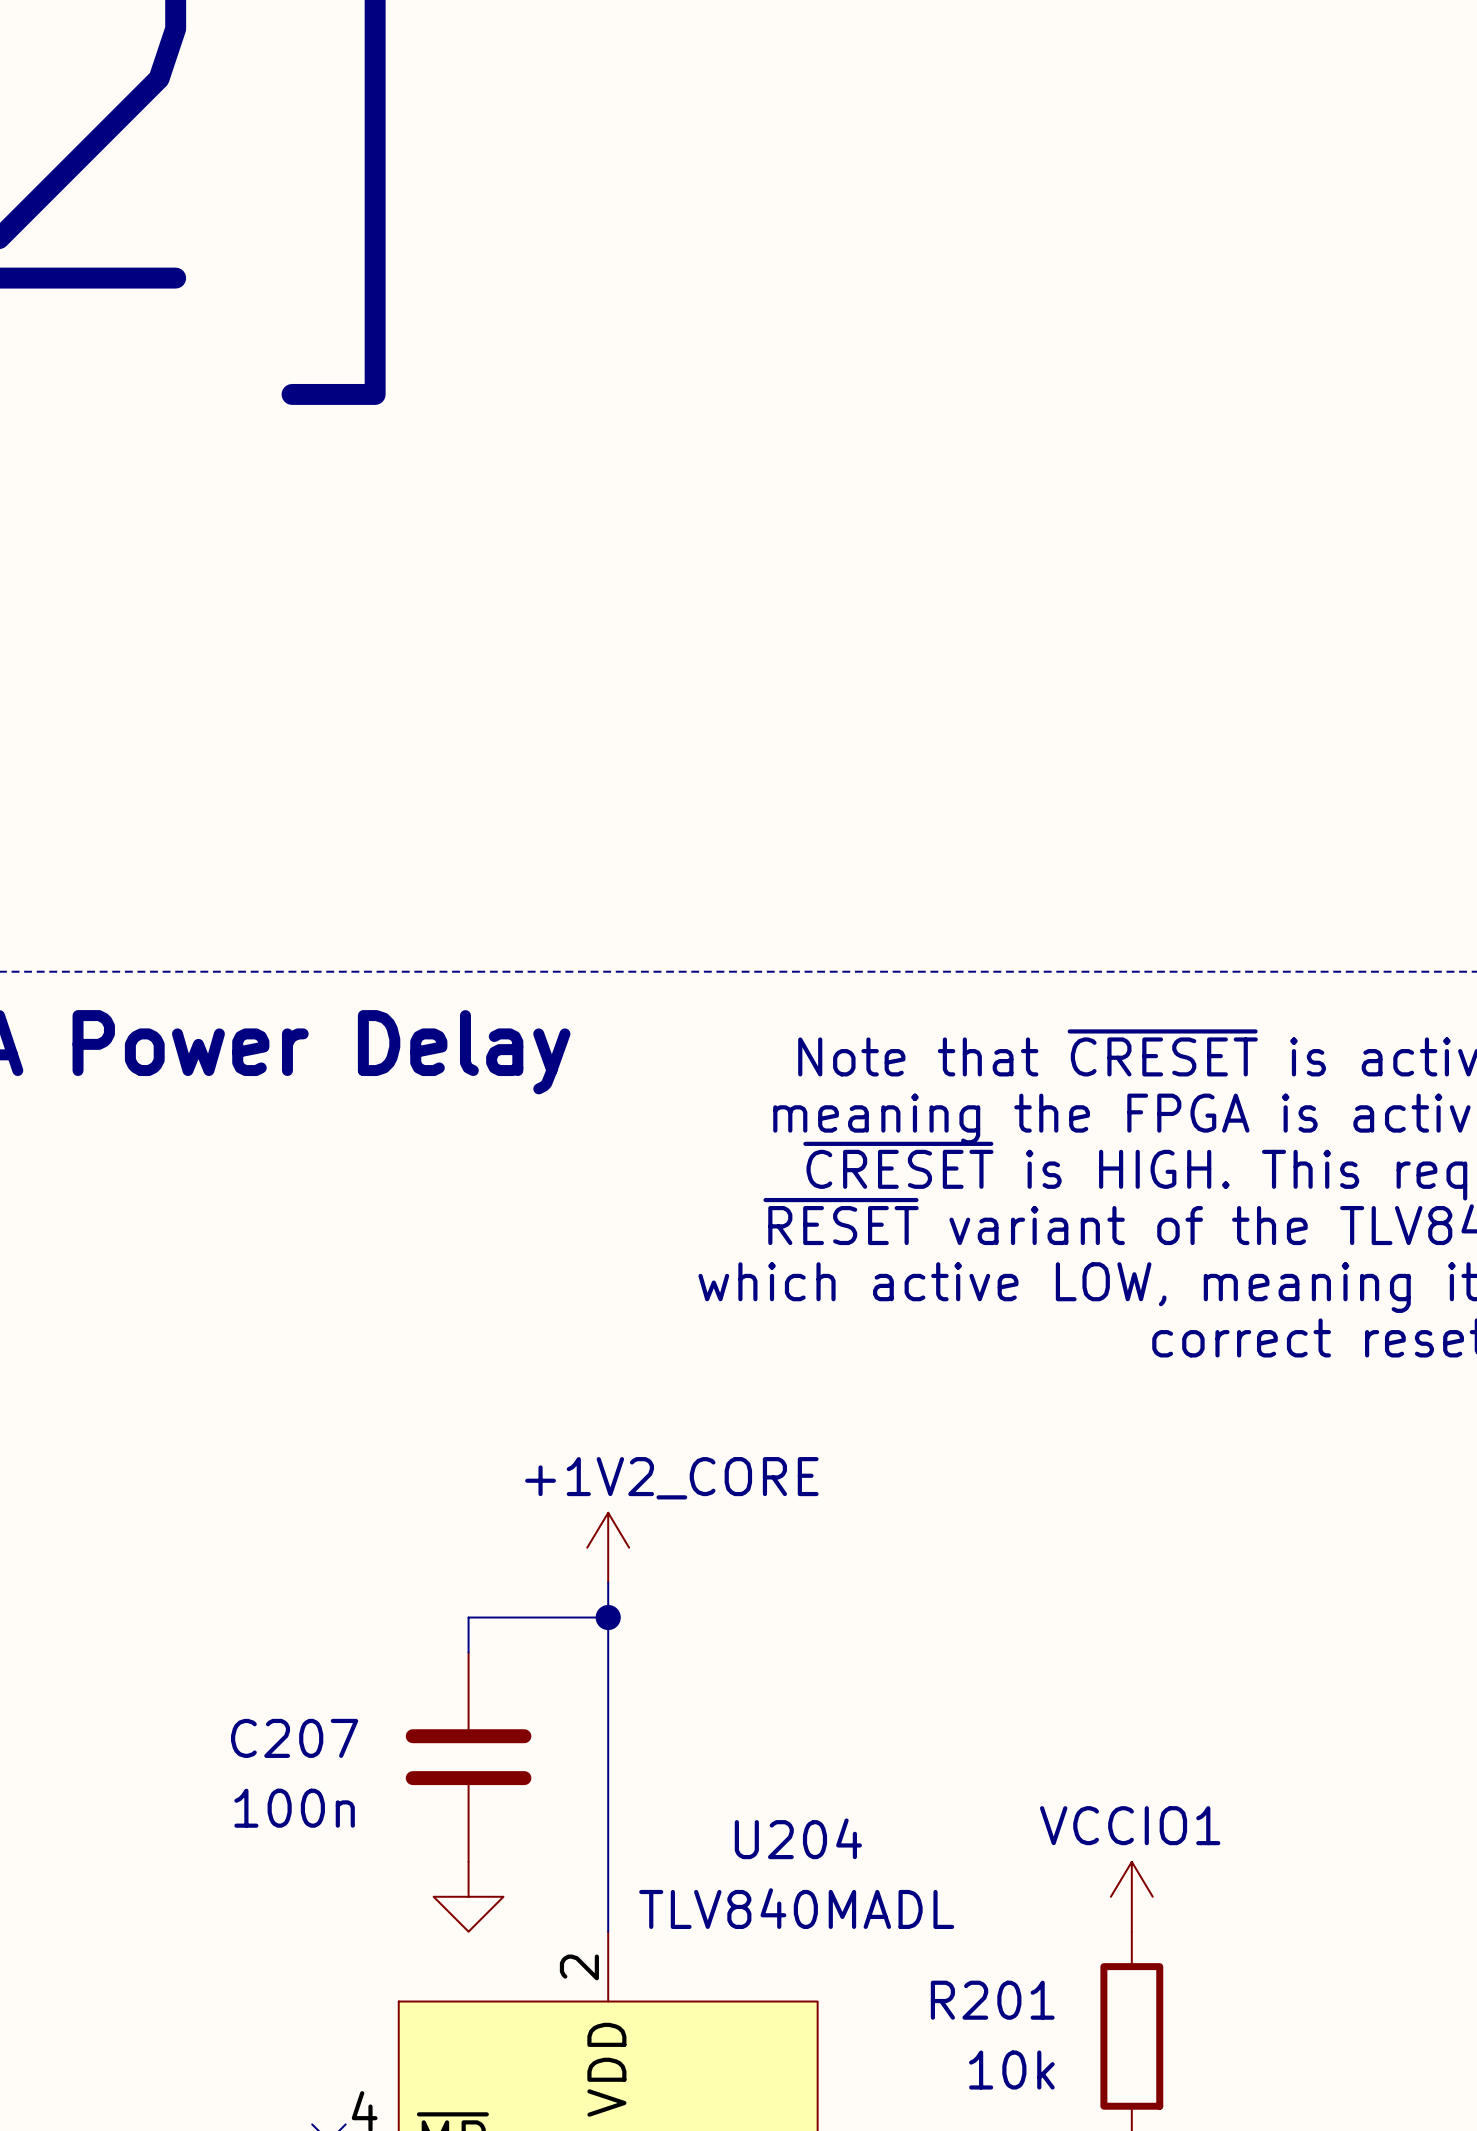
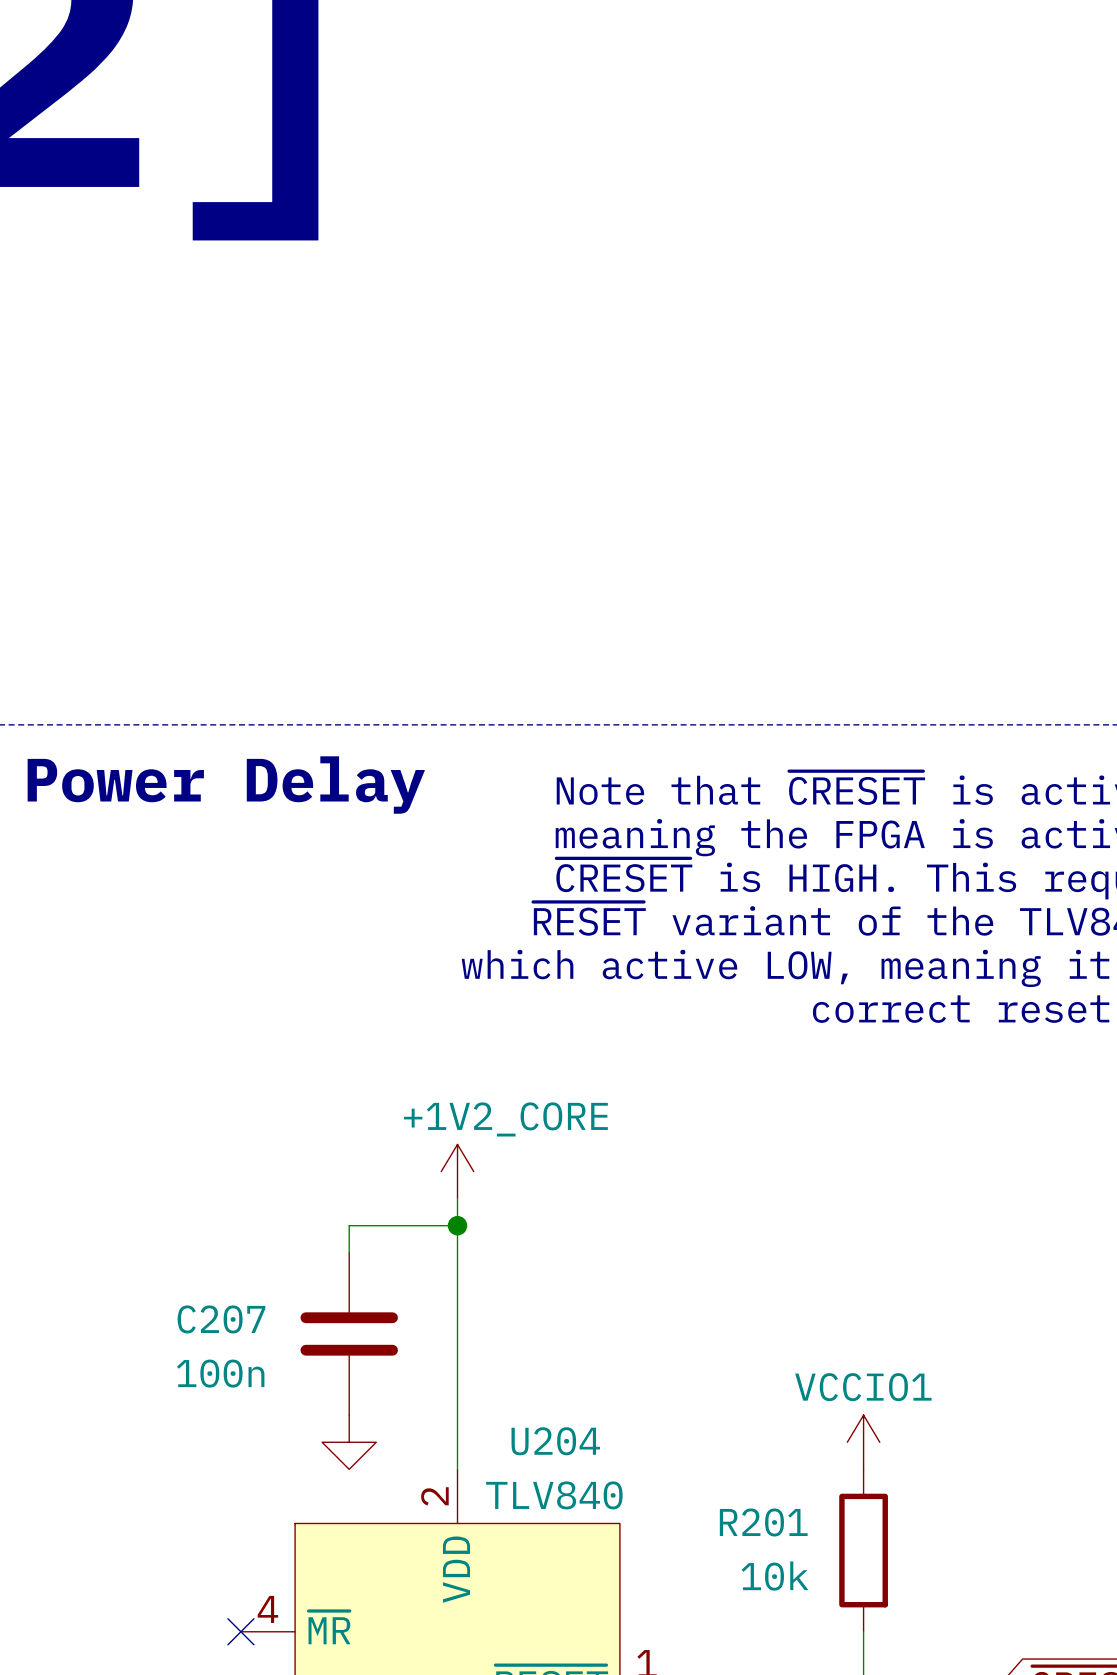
U204 name position: U204 (798, 1838) -> U204 (555, 1441)
U204 value: TLV840MADL (796, 1908) -> TLV840 (554, 1495)

